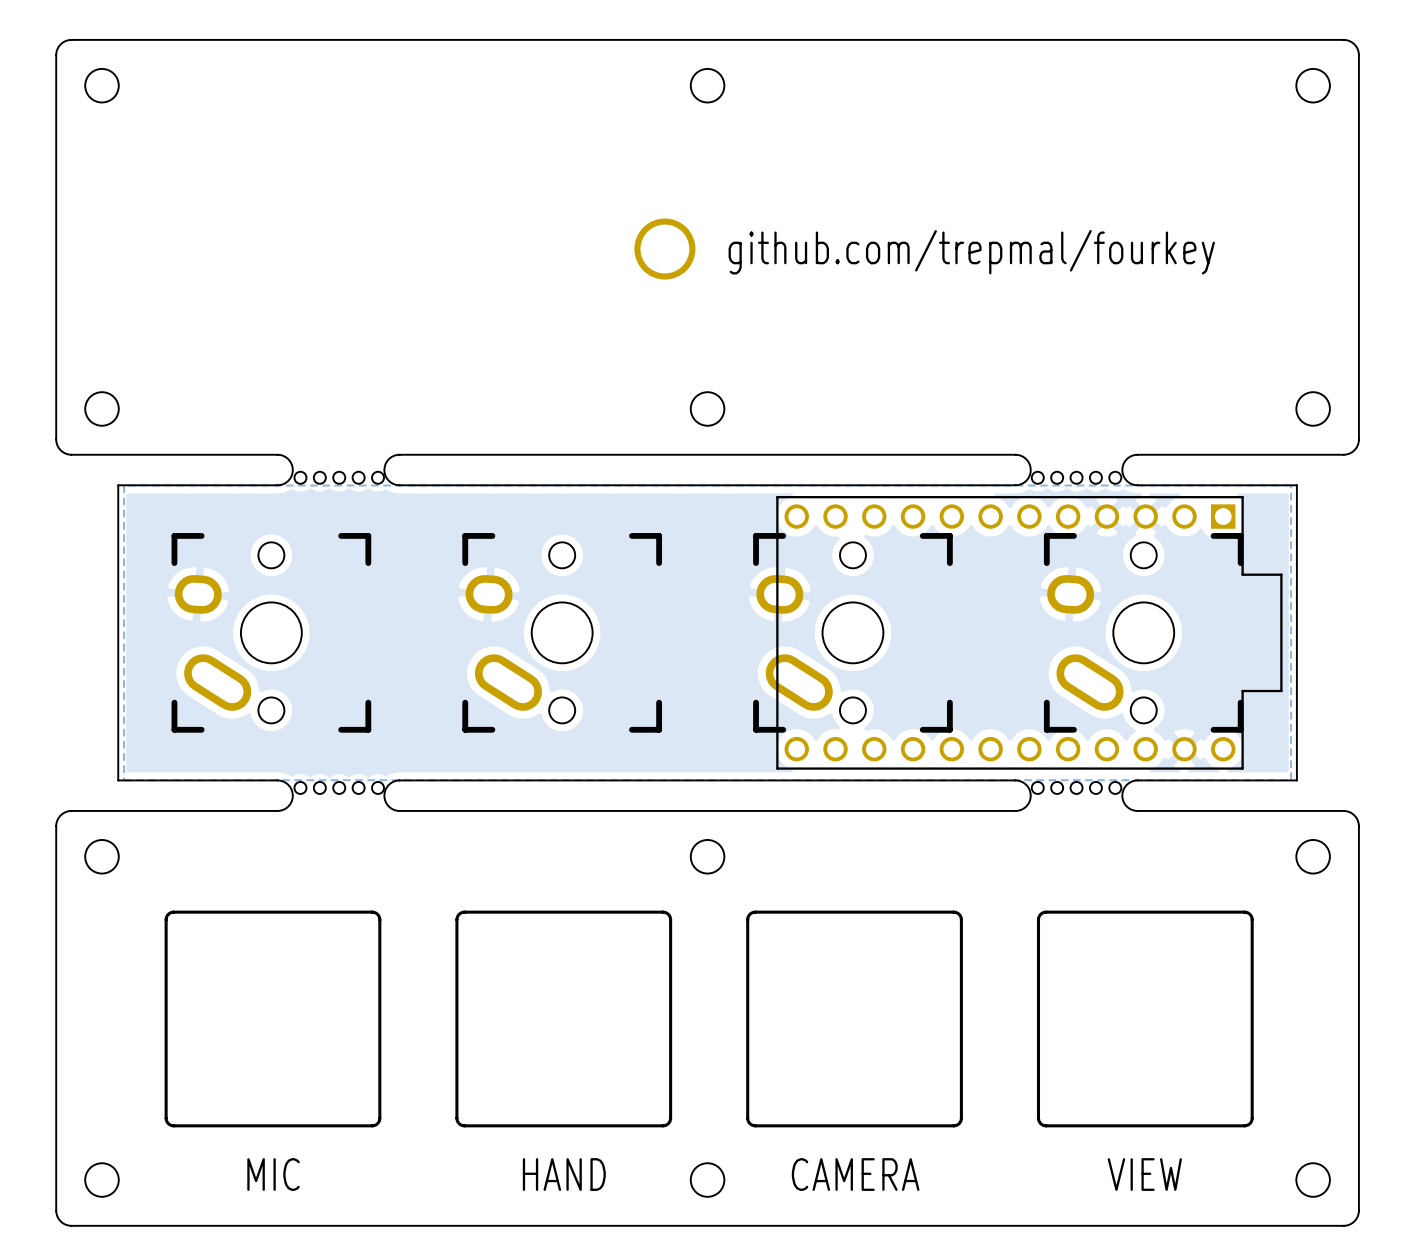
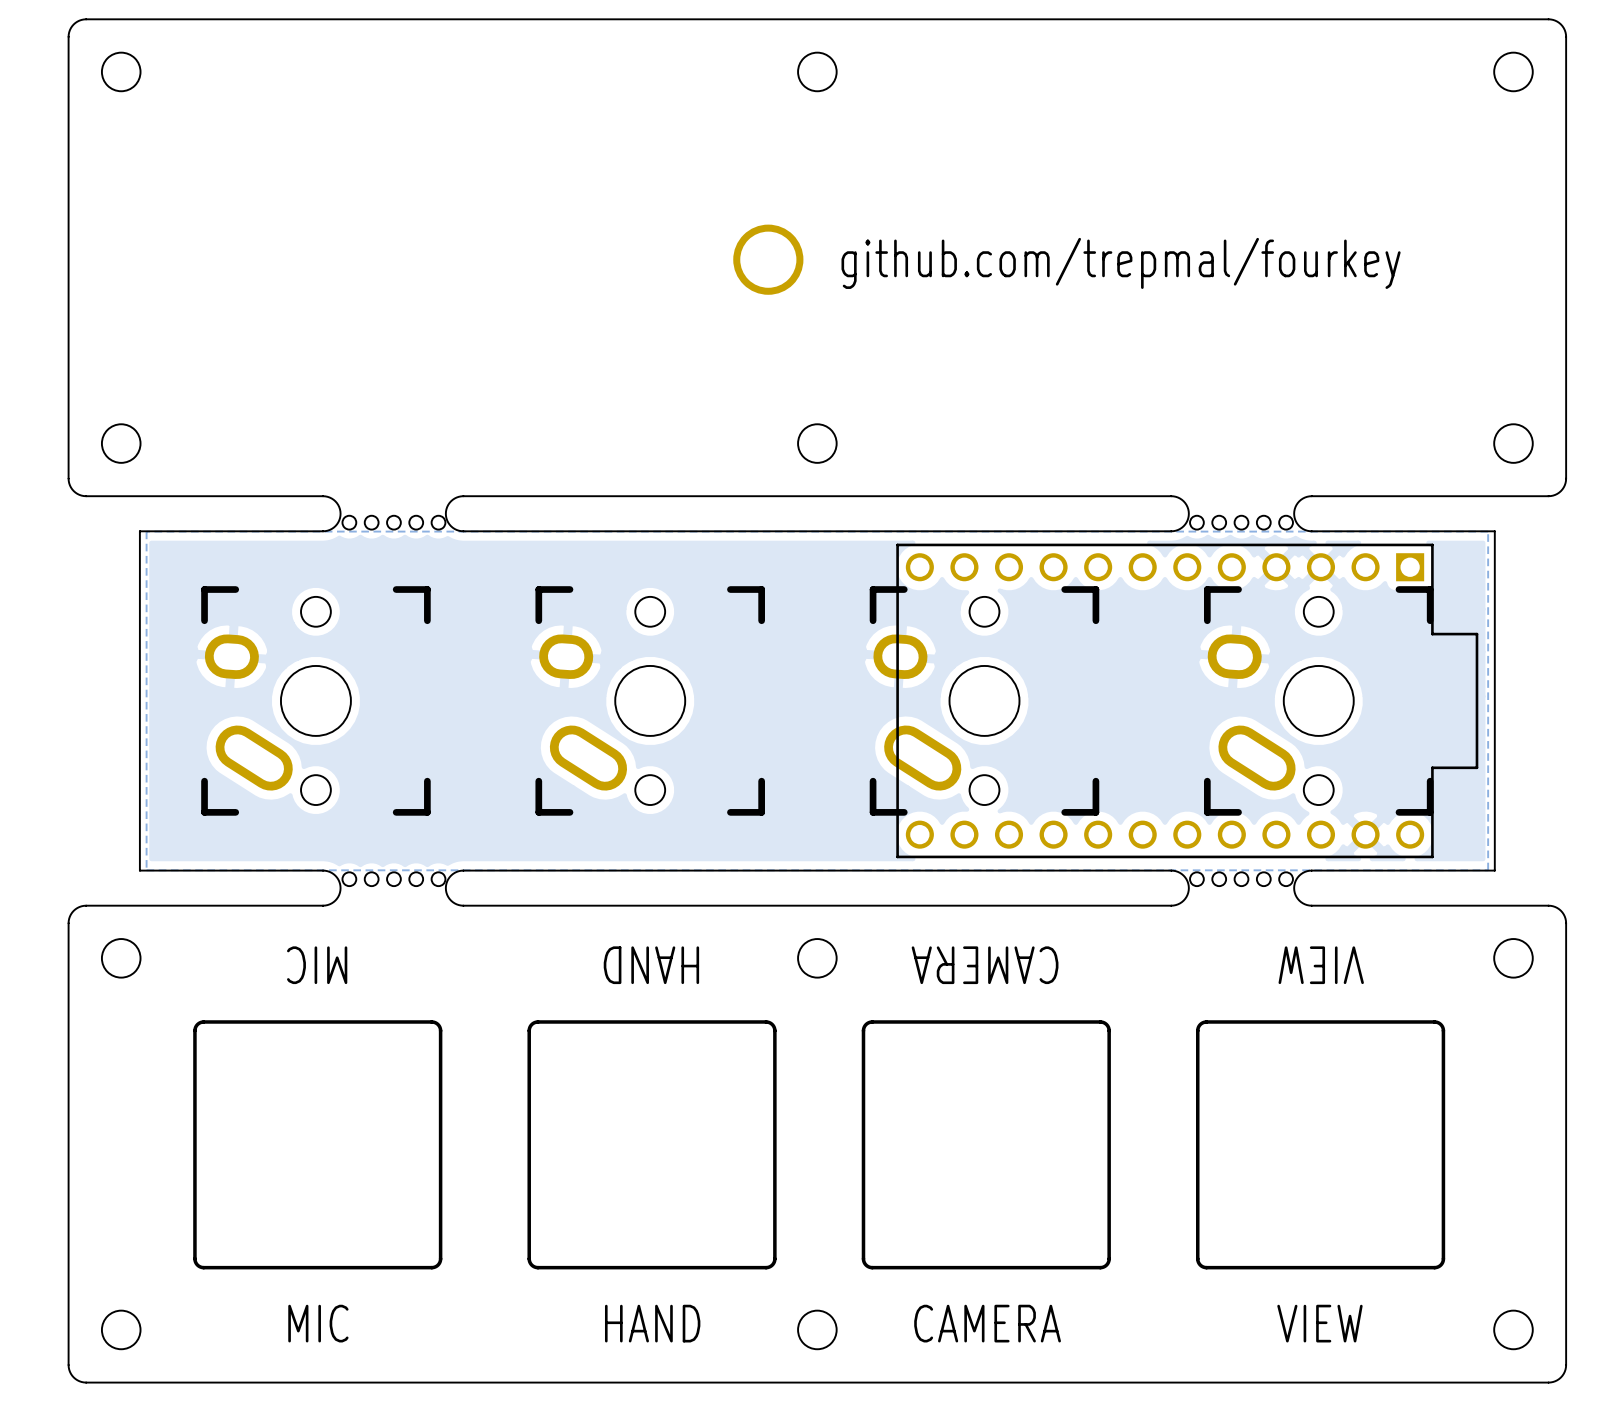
text: none -> MIC (317, 965)
text: none -> HAND (651, 965)
text: none -> CAMERA (985, 965)
text: none -> VIEW (1321, 965)

